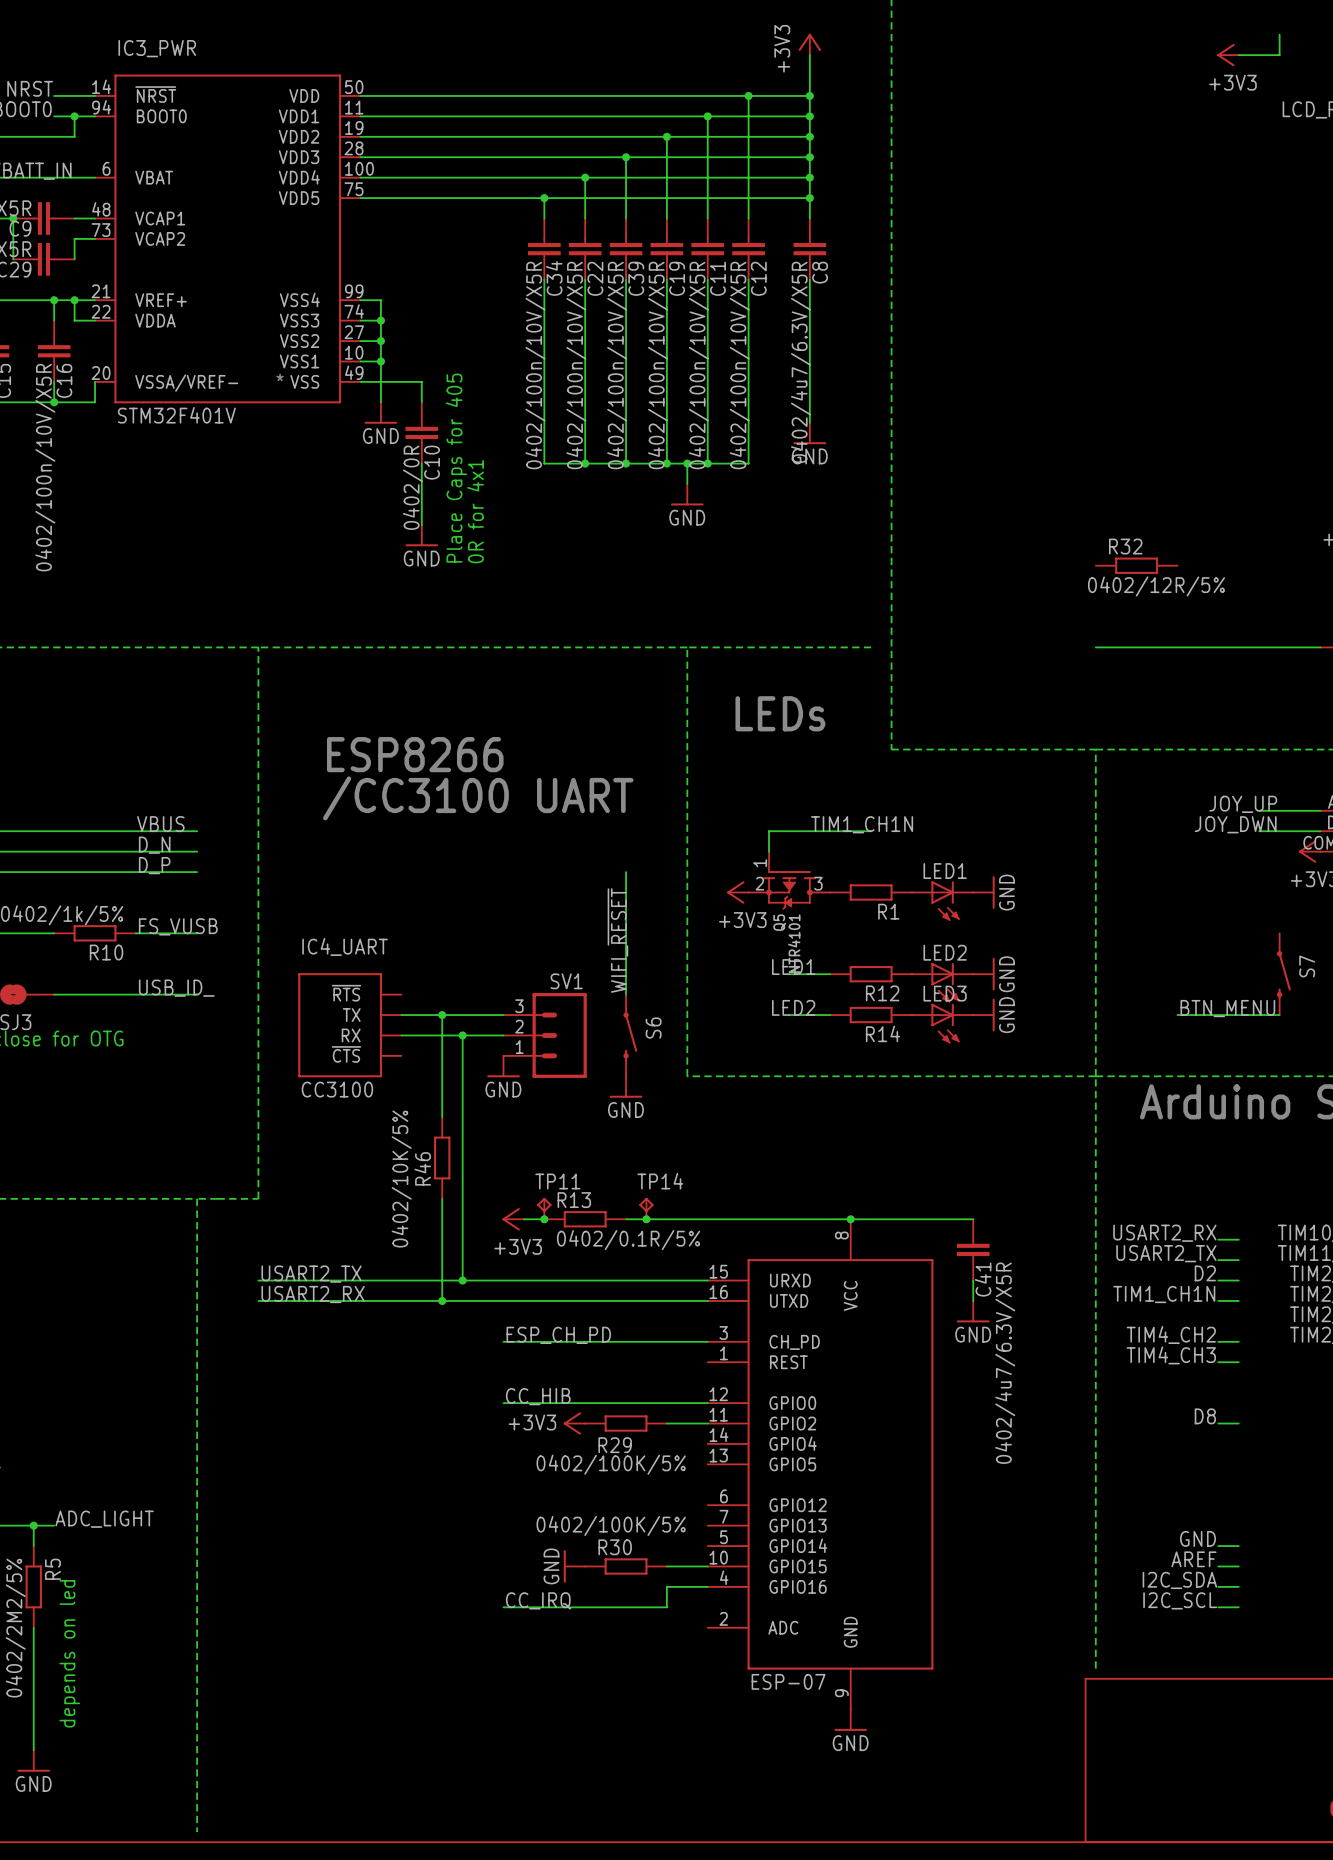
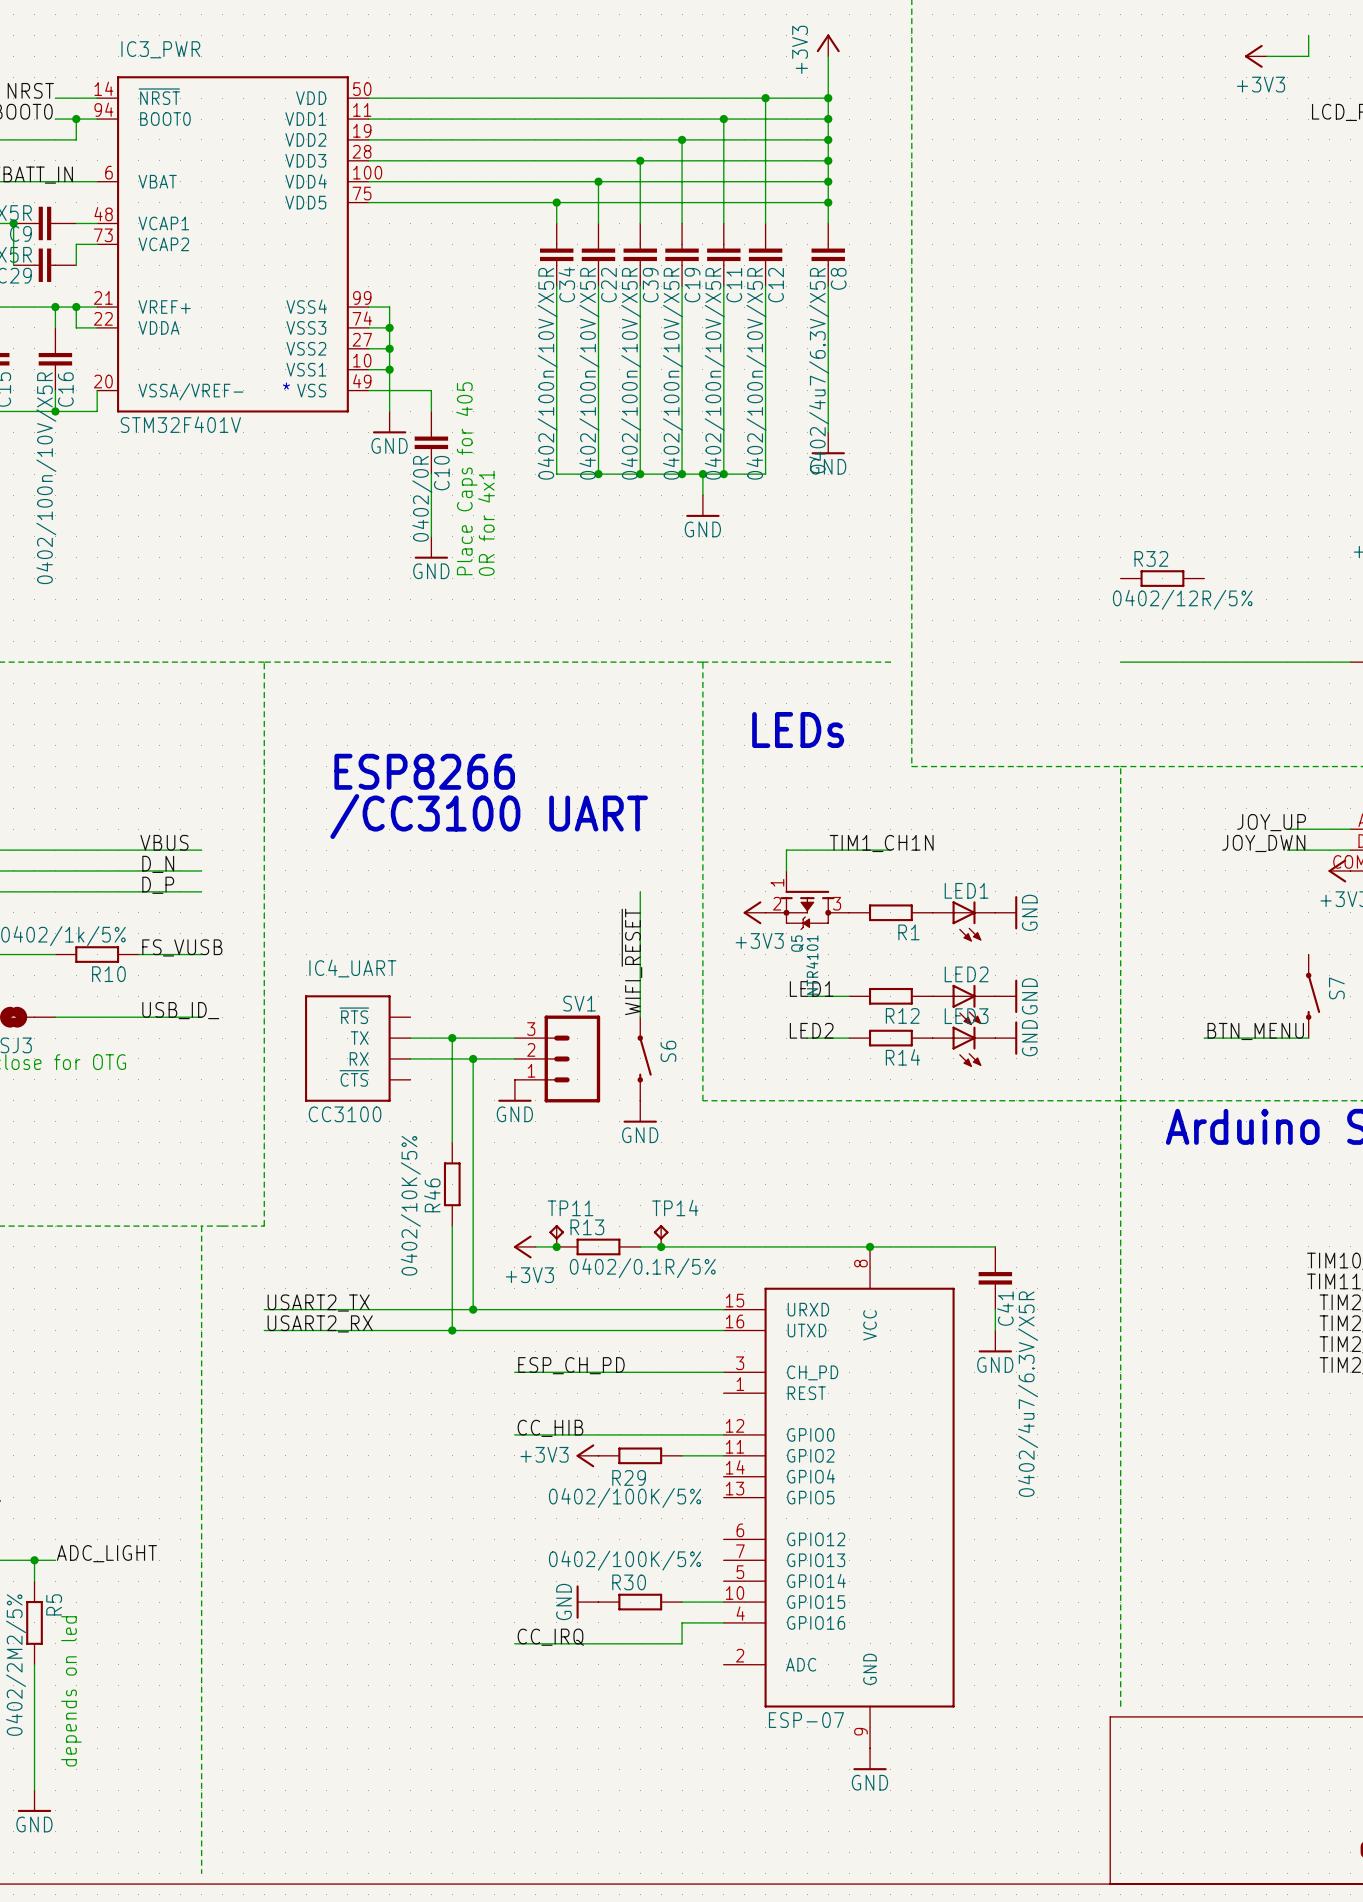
label: USART2_RX (1164, 1233) -> none
wire: (1218, 1239) (1238, 1239) -> none
label: USART2_TX (1166, 1253) -> none
wire: (1218, 1260) (1238, 1260) -> none
label: D2 (1205, 1273) -> none
wire: (1218, 1280) (1238, 1280) -> none
label: TIM1_CH1N (1164, 1294) -> none
wire: (1218, 1300) (1238, 1300) -> none
label: TIM4_CH2 (1171, 1335) -> none
wire: (1218, 1341) (1238, 1341) -> none
label: TIM4_CH3 (1171, 1355) -> none
wire: (1218, 1362) (1238, 1362) -> none
label: D8 (1205, 1416) -> none
wire: (1218, 1423) (1238, 1423) -> none
label: GND (1197, 1538) -> none
wire: (1218, 1546) (1238, 1546) -> none
label: AREF (1193, 1559) -> none
wire: (1218, 1566) (1238, 1566) -> none
label: I2C_SDA (1179, 1580) -> none
wire: (1218, 1586) (1238, 1586) -> none
label: I2C_SCL (1180, 1600) -> none
wire: (1218, 1607) (1238, 1607) -> none

